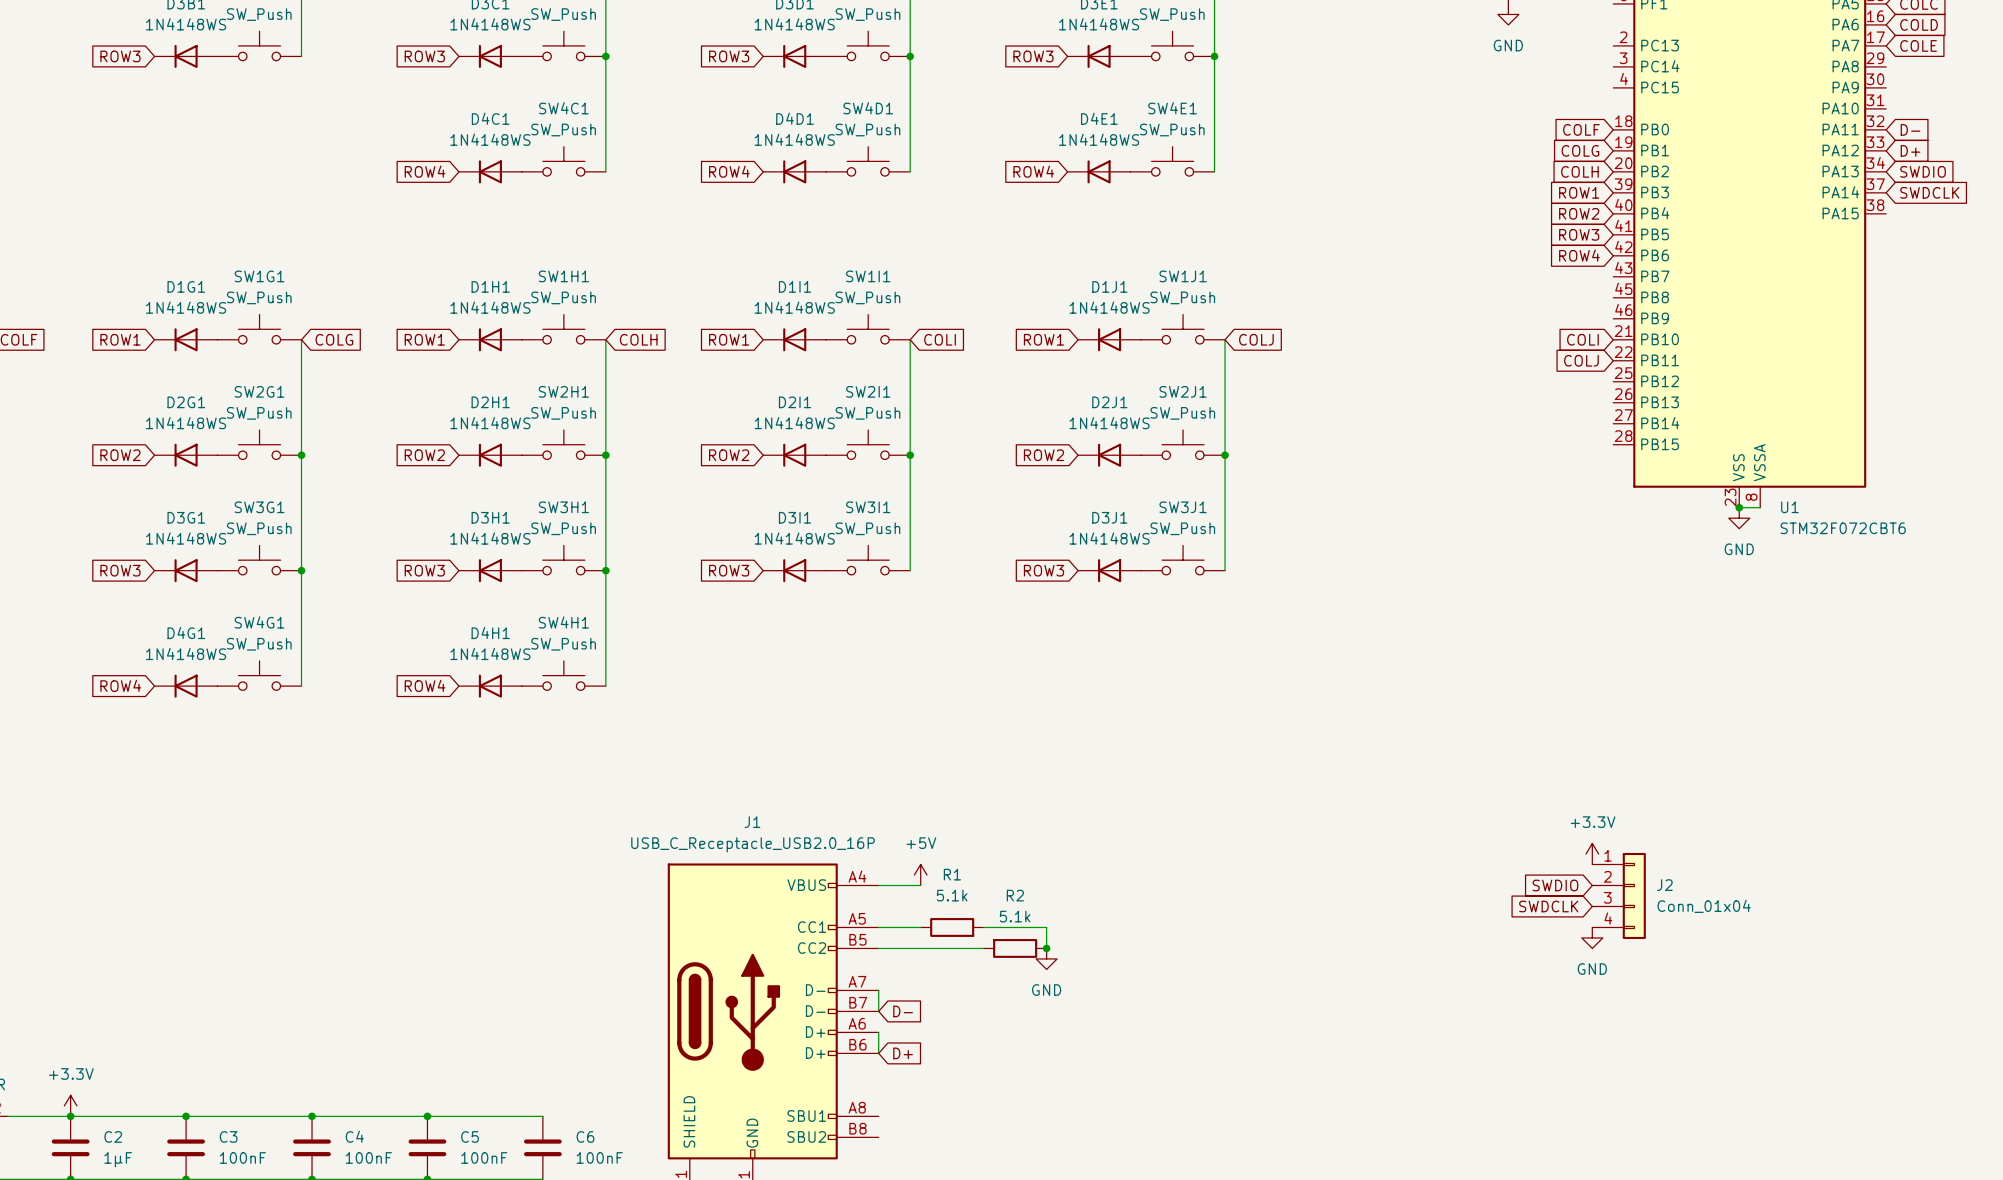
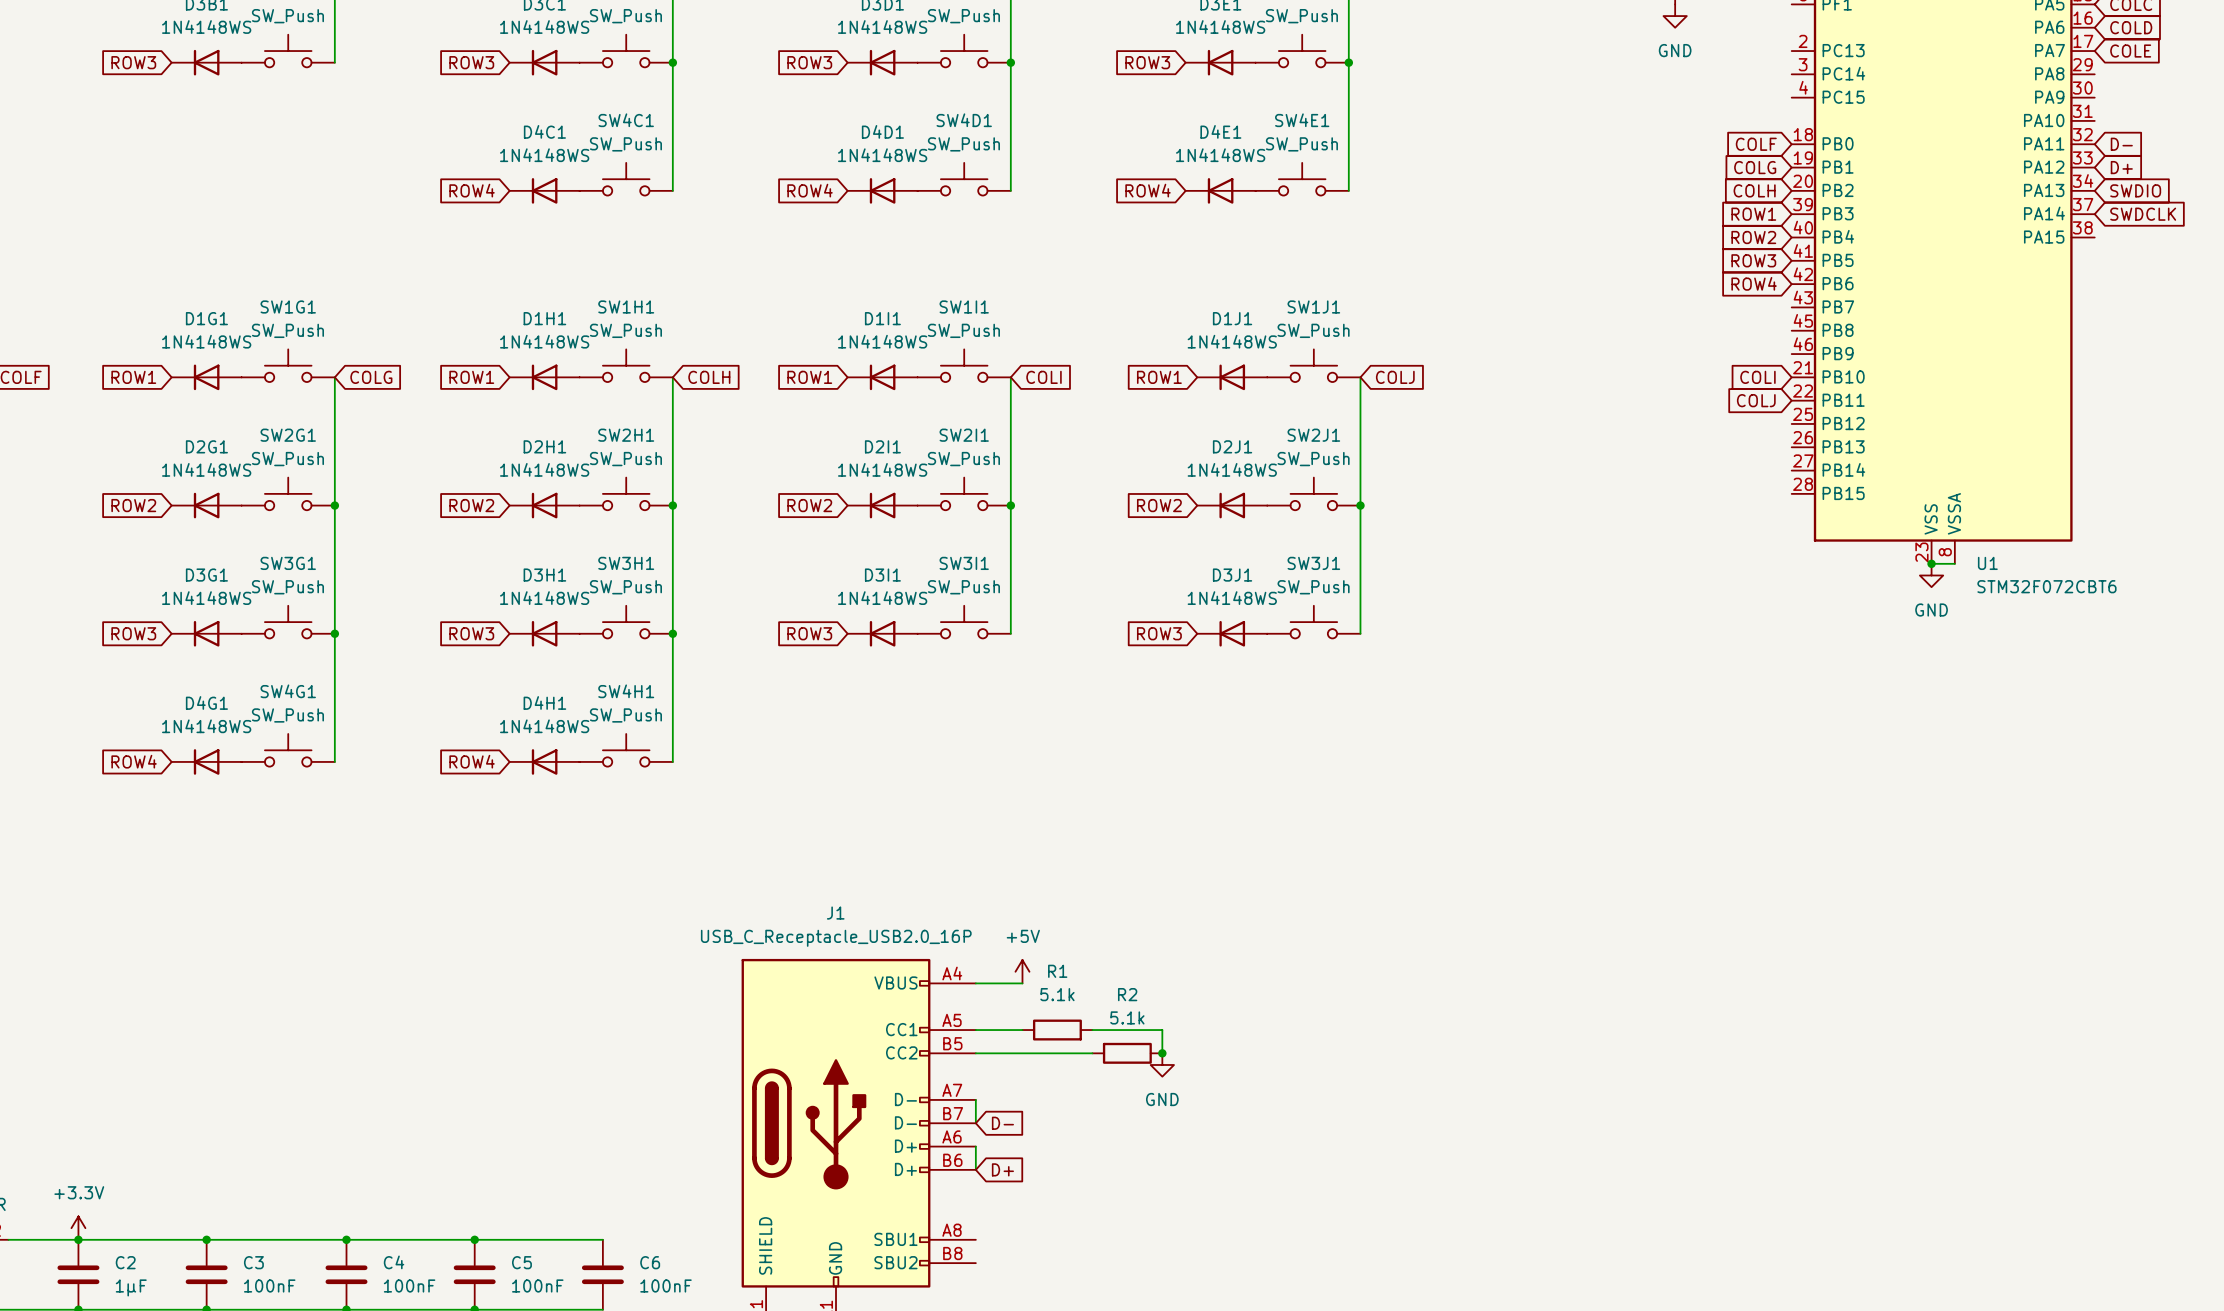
power symbol: +3.3V (1592, 854) -> none
global label: SWDIO (1555, 885) -> none
J2: Conn_01x04 (1619, 895) -> none
global label: SWDCLK (1548, 906) -> none
power symbol: GND (1592, 937) -> none

